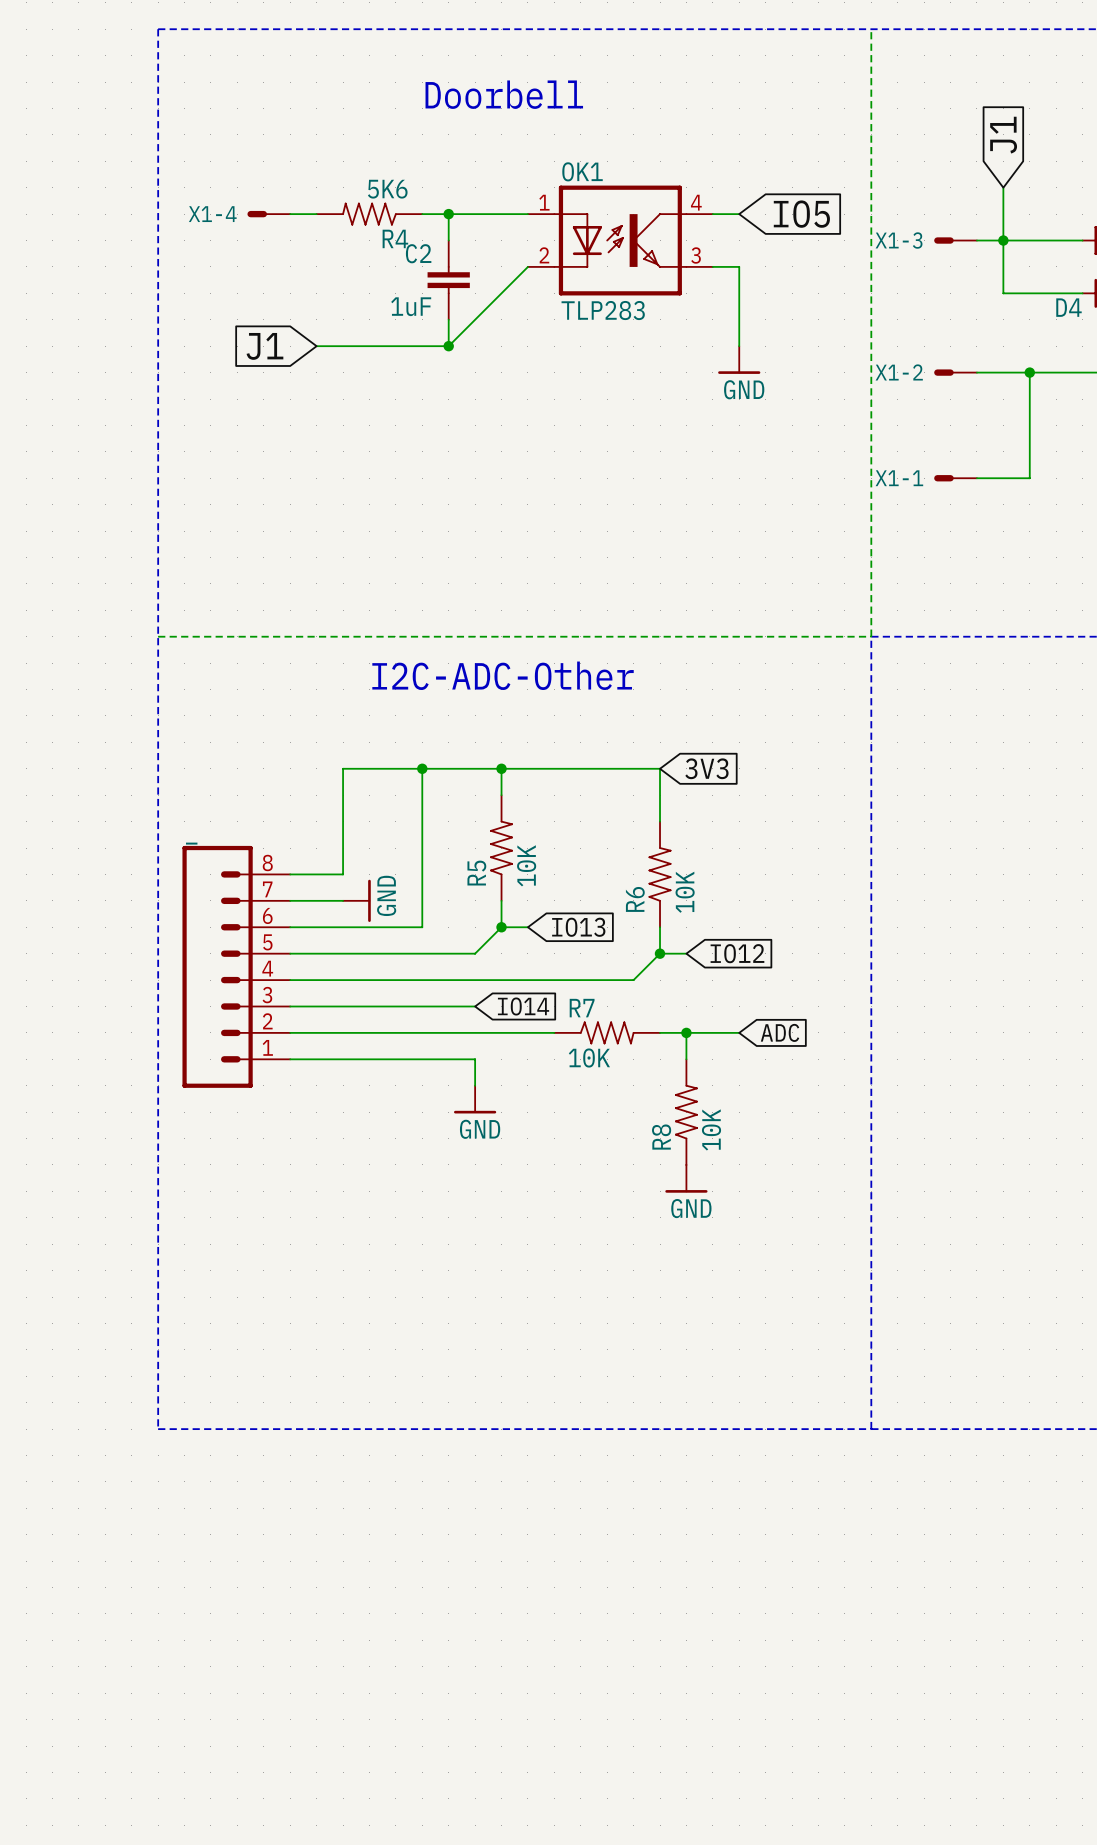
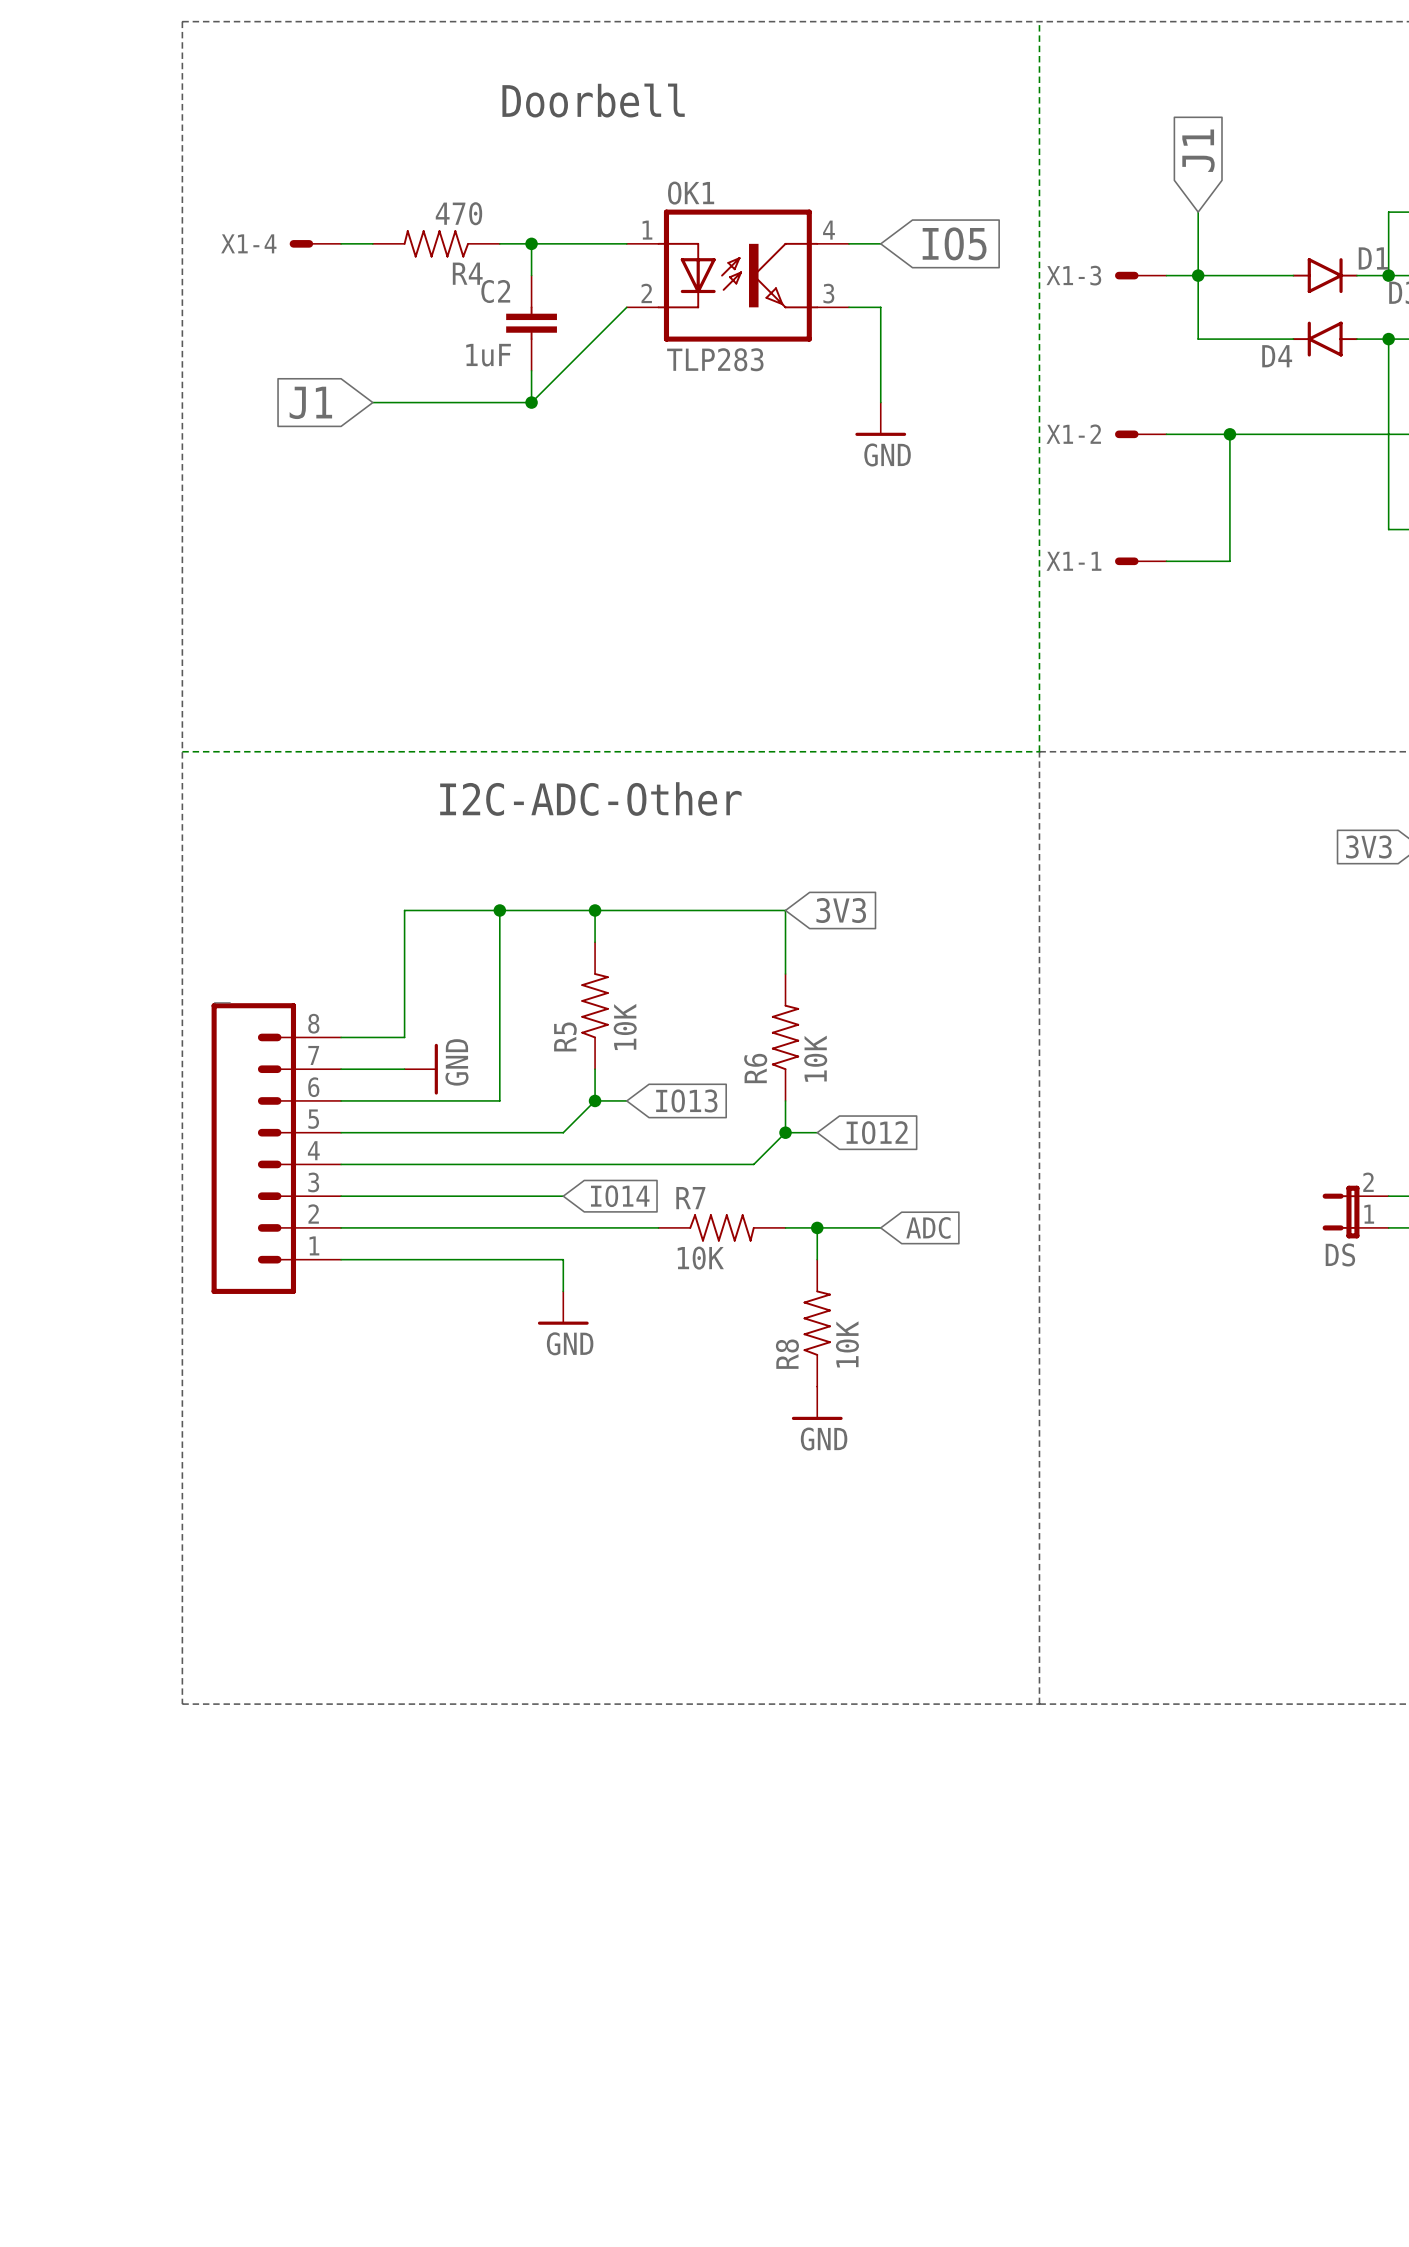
R4 value: 5K6 (387, 189) -> 470 (458, 213)

